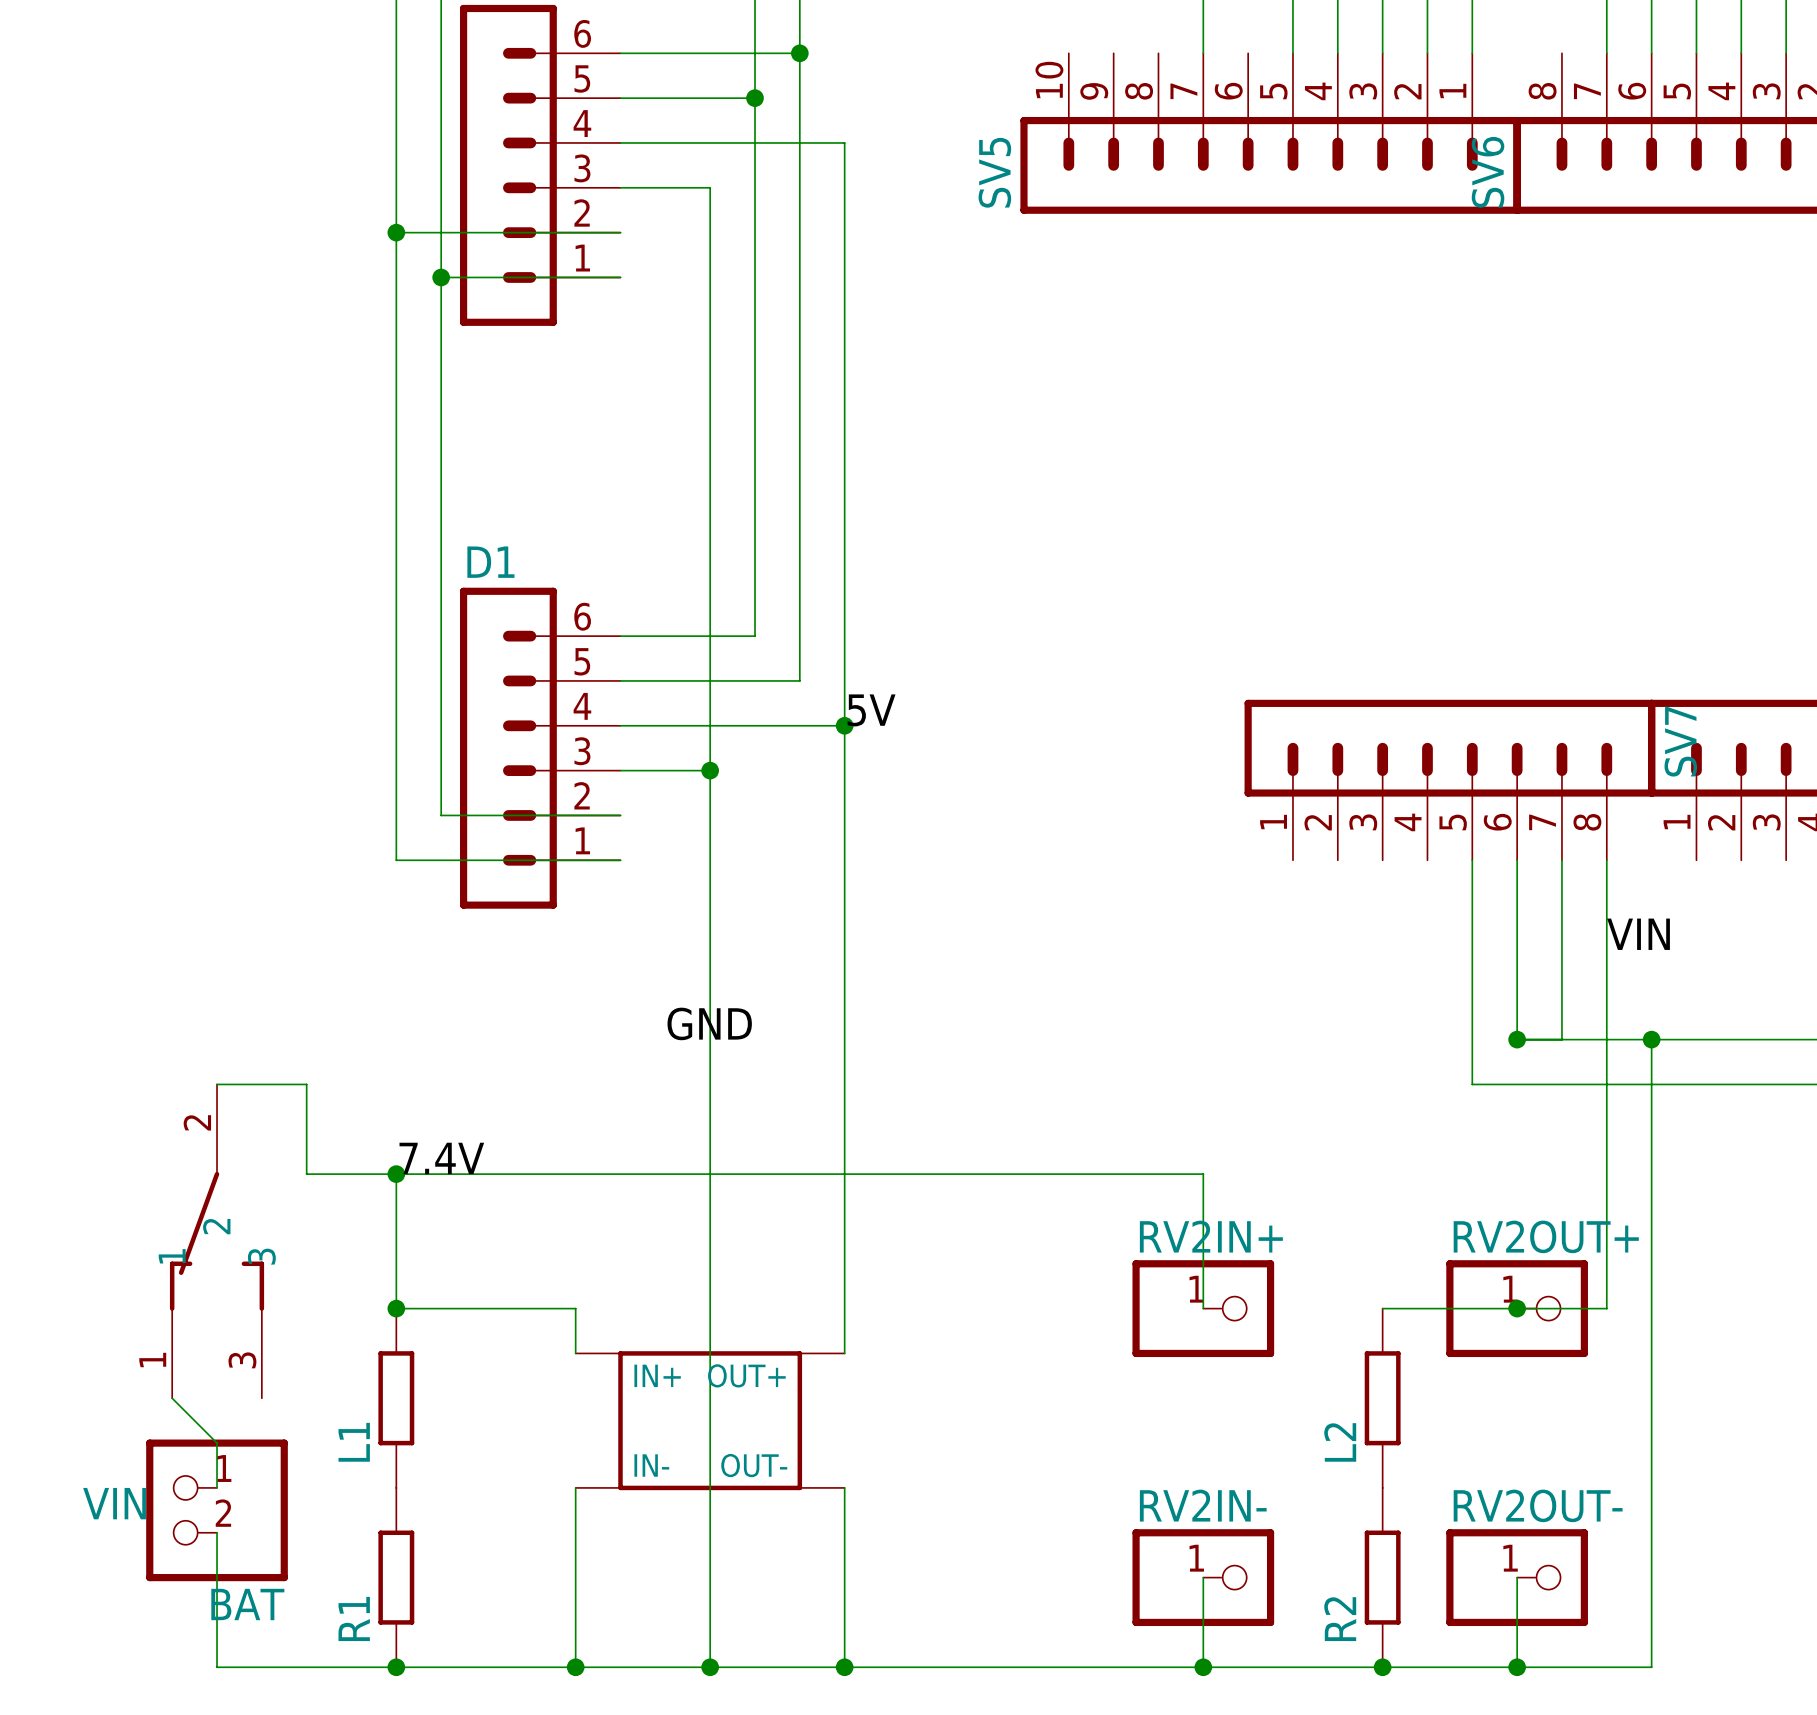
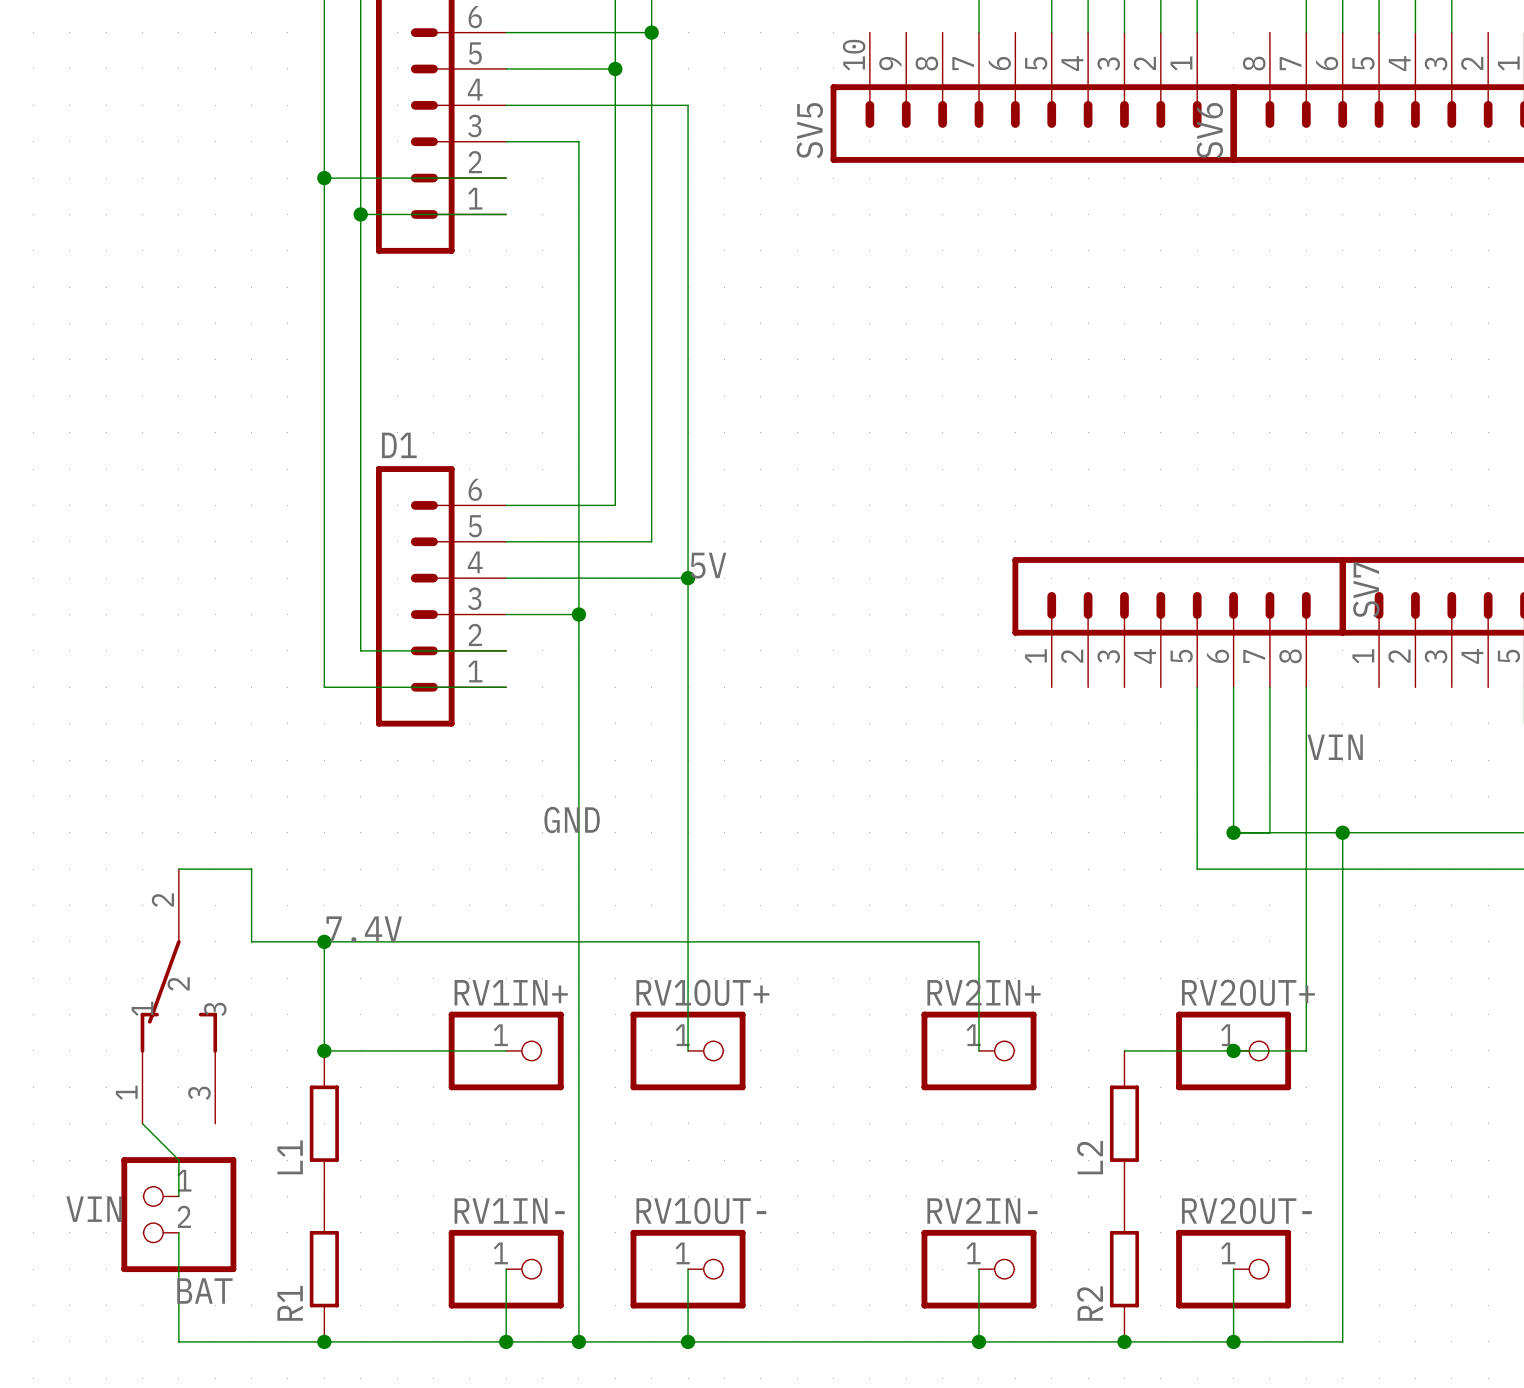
wire: (575, 1308) (575, 1353) -> (469, 1050) (506, 1050)
RV1IN+: none -> (506, 1050)
wire: (844, 1308) (844, 1353) -> none
RV1OUT+: none -> (688, 1050)
part: (710, 1420) -> none
wire: (575, 1487) (575, 1667) -> none
wire: (844, 1487) (844, 1577) -> (506, 1269) (506, 1341)
RV1IN-: none -> (506, 1269)
RV1OUT-: none -> (688, 1269)
junction position: (575, 1667) -> (506, 1341)

